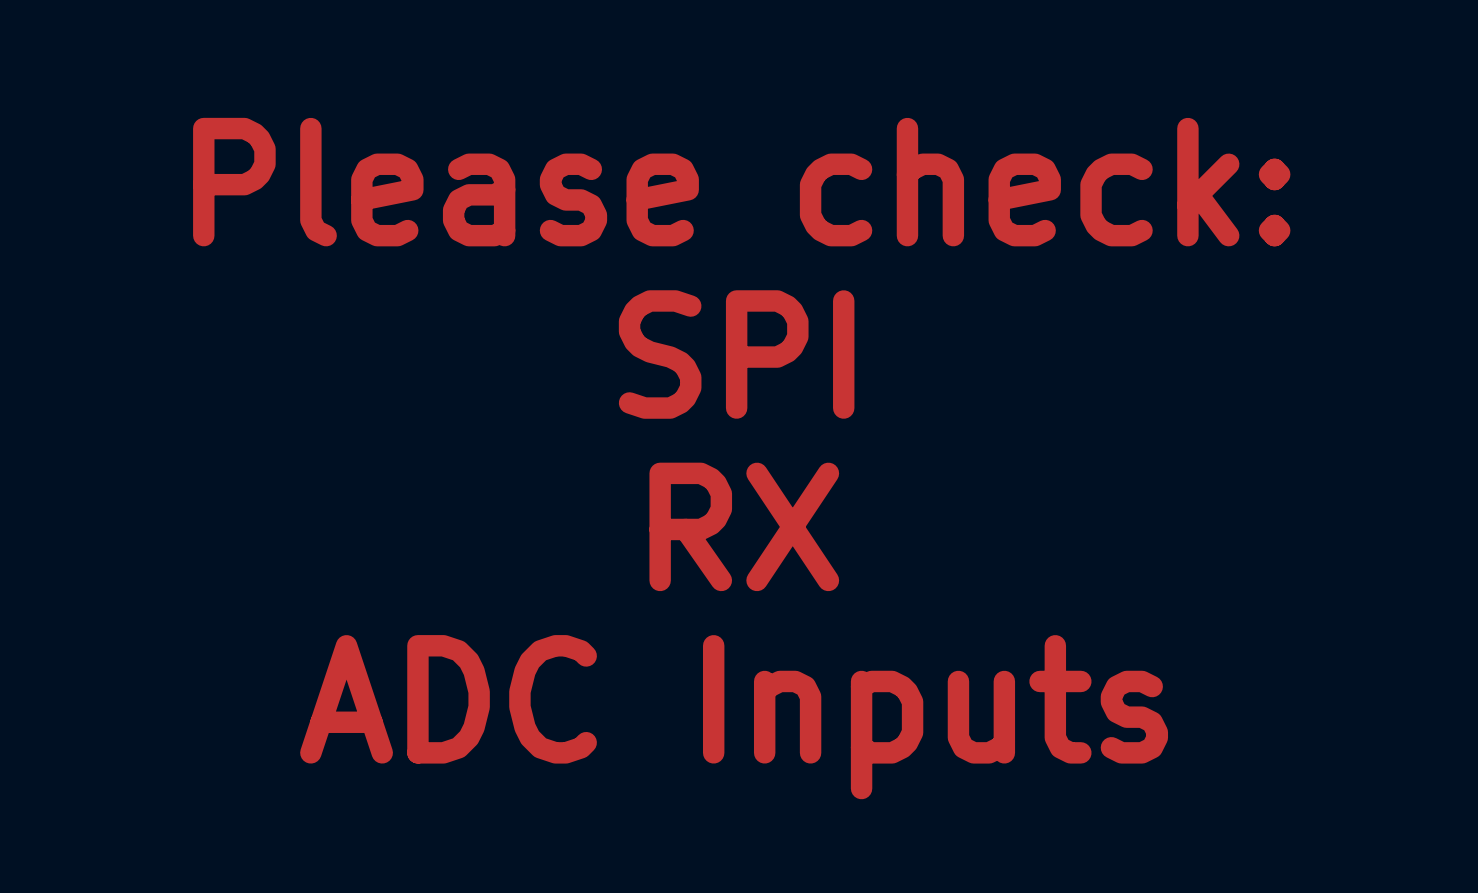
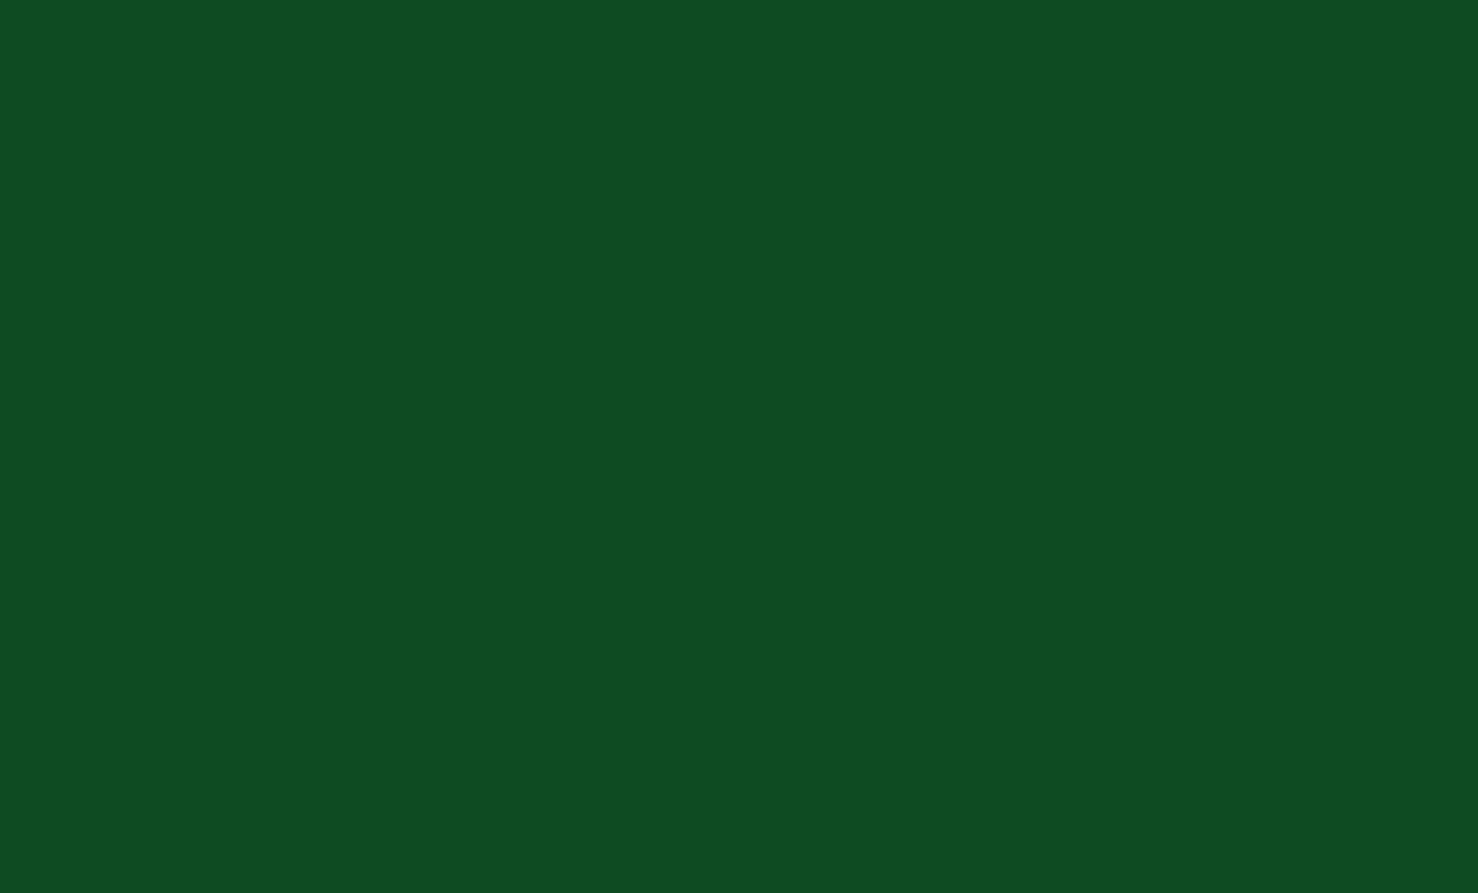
text: Please check: (741, 182) -> none
text: SPI (736, 354) -> none
text: RX (744, 526) -> none
text: ADC Inputs (734, 717) -> none

